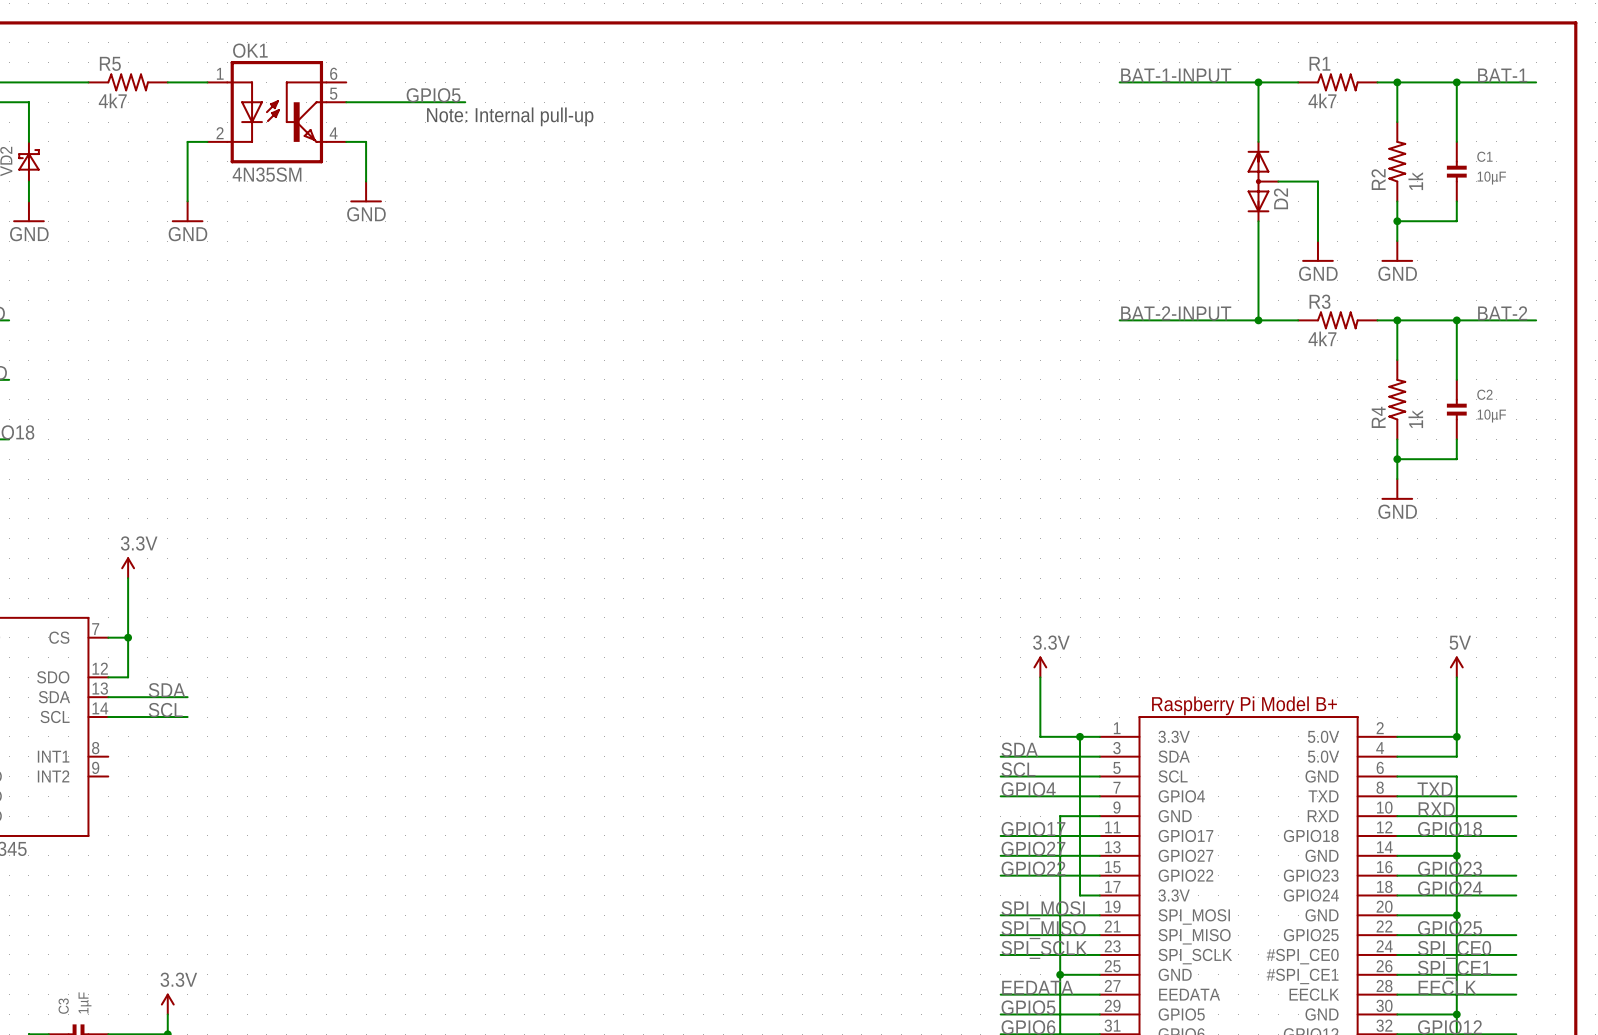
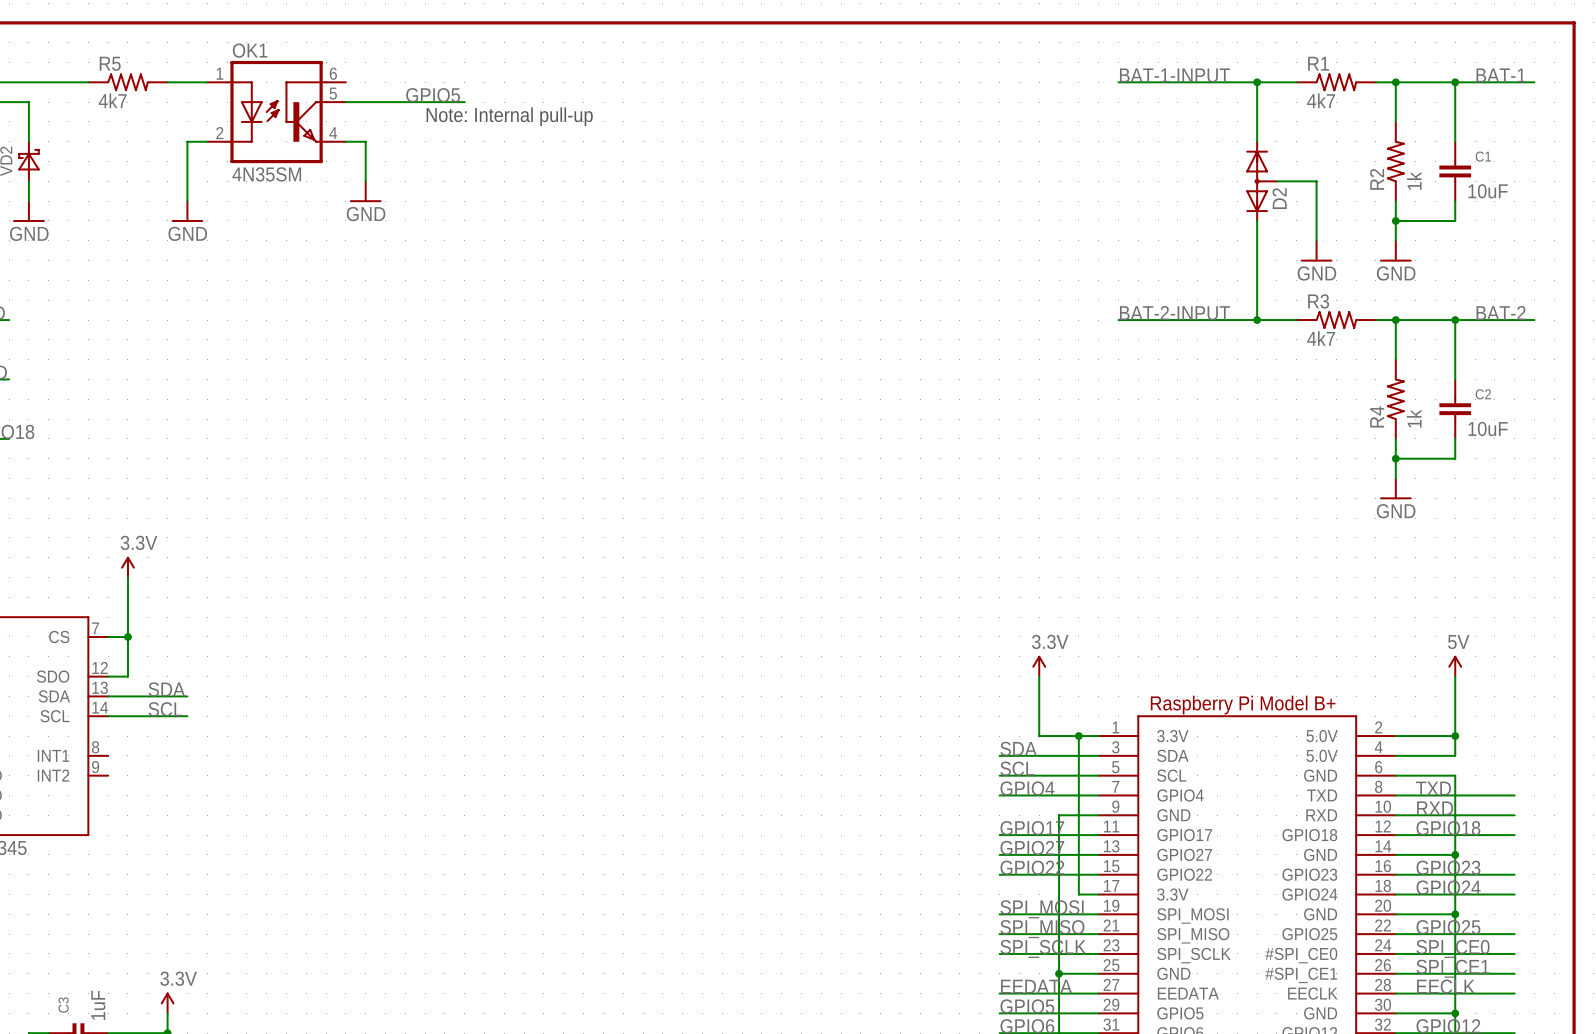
C1 symbol: [1446, 141, 1467, 202] -> [1439, 141, 1472, 202]
C1 value: 10µF (1491, 178) -> 10uF (1488, 191)
C2 symbol: [1446, 379, 1467, 440] -> [1439, 379, 1472, 439]
C2 value: 10µF (1491, 416) -> 10uF (1488, 428)
C3 value: 1µF (84, 1002) -> 1uF (98, 1005)

